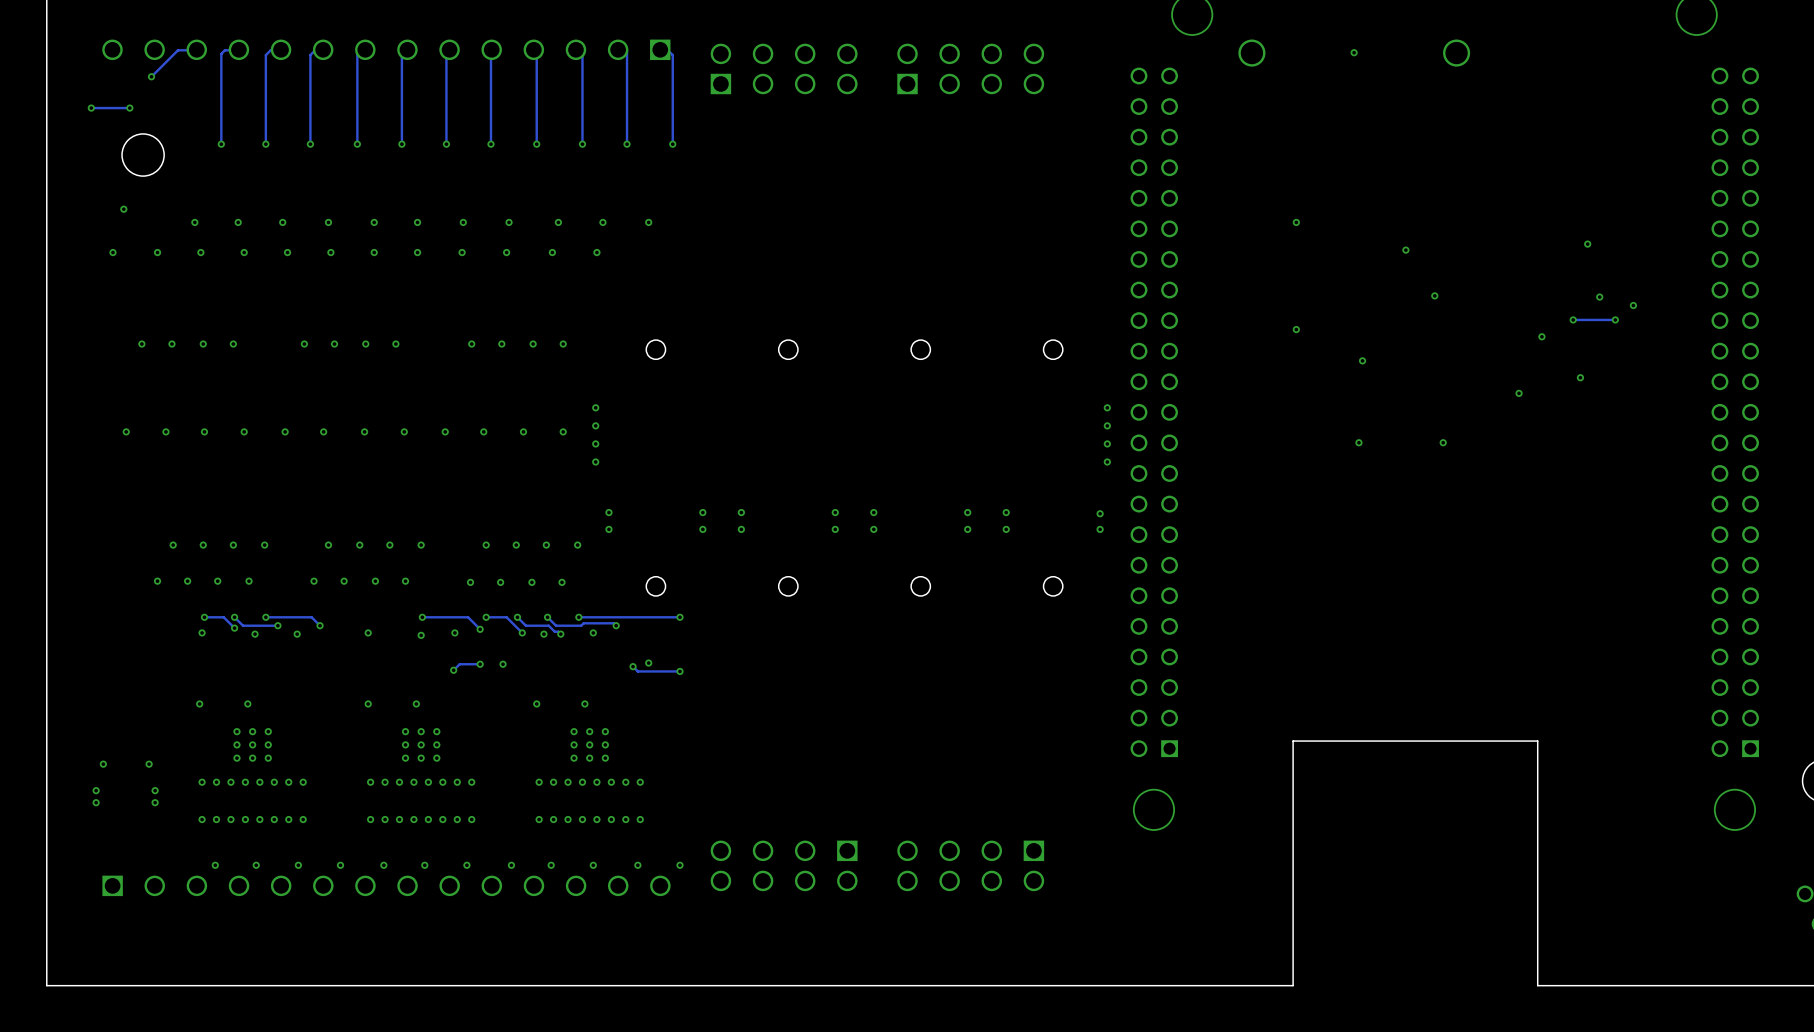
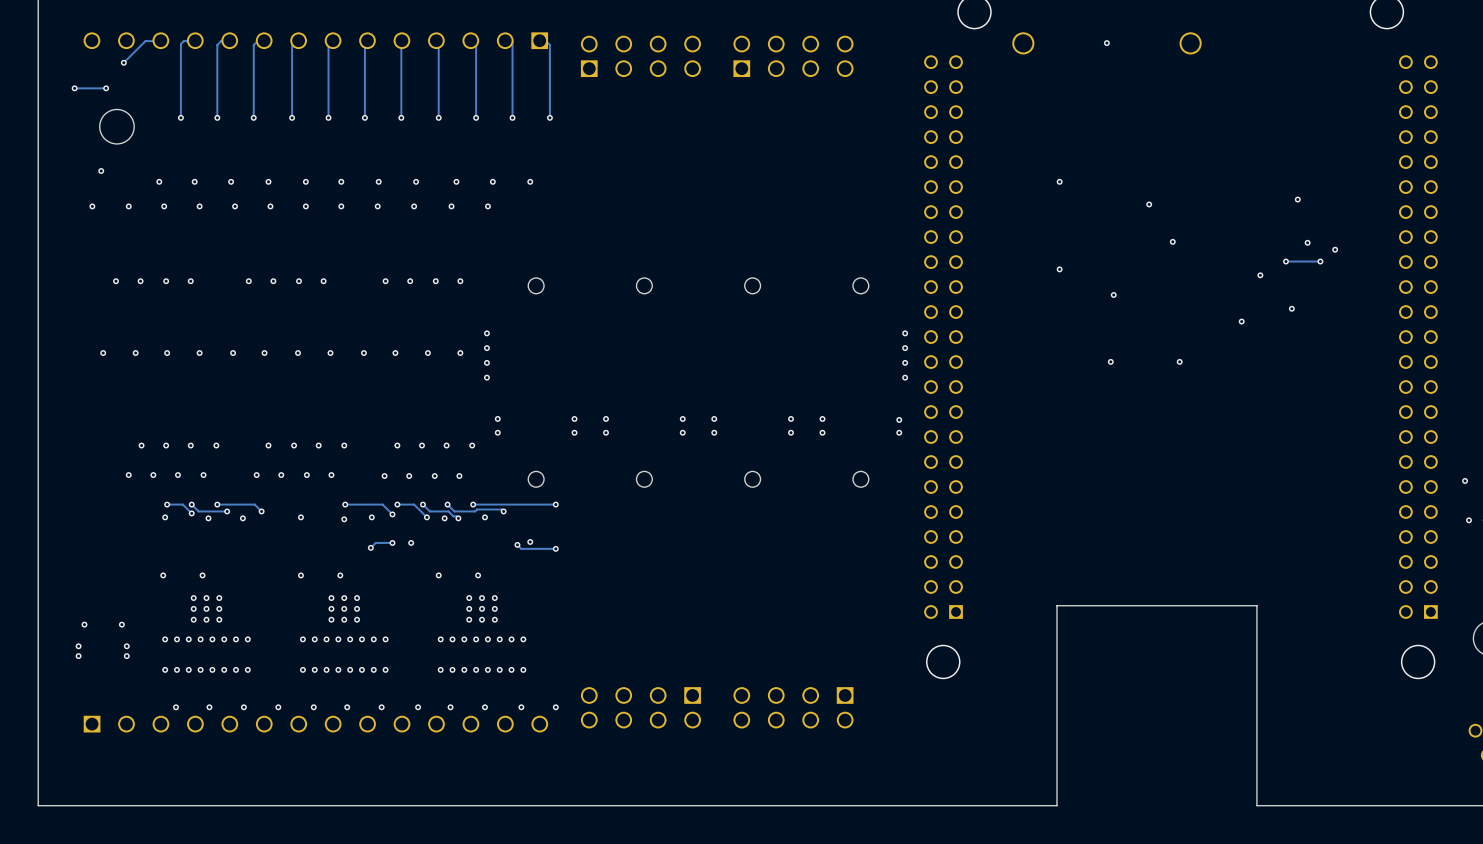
via: none -> (1465, 480)
via: none -> (1468, 520)

